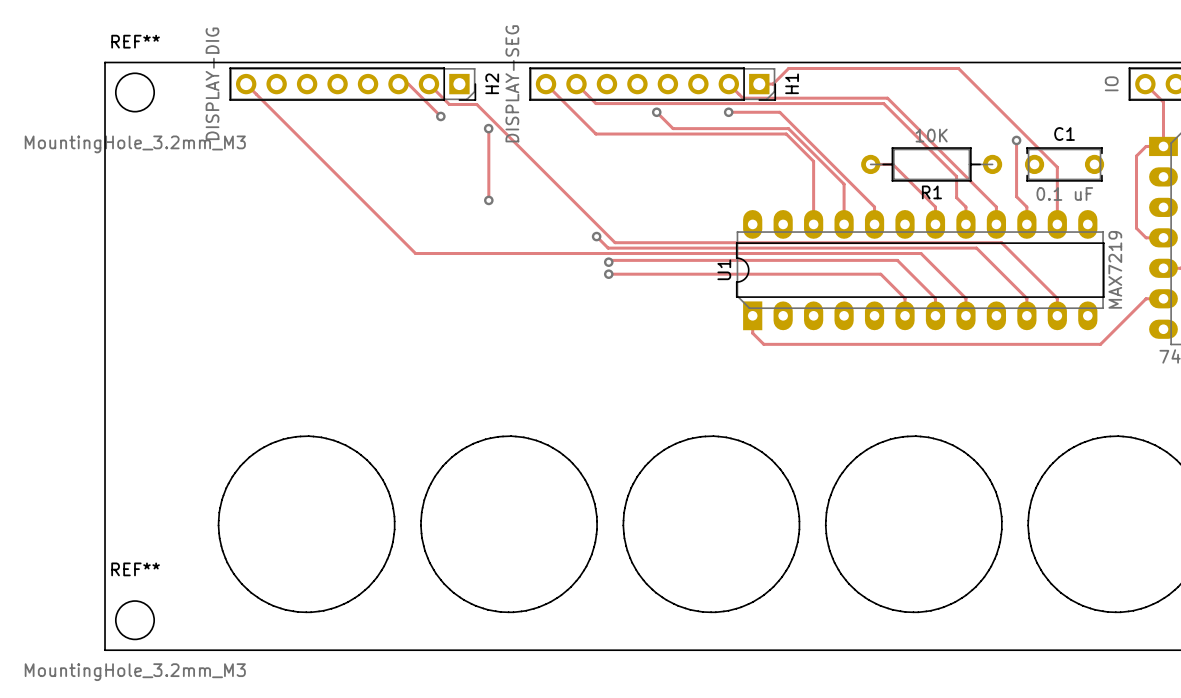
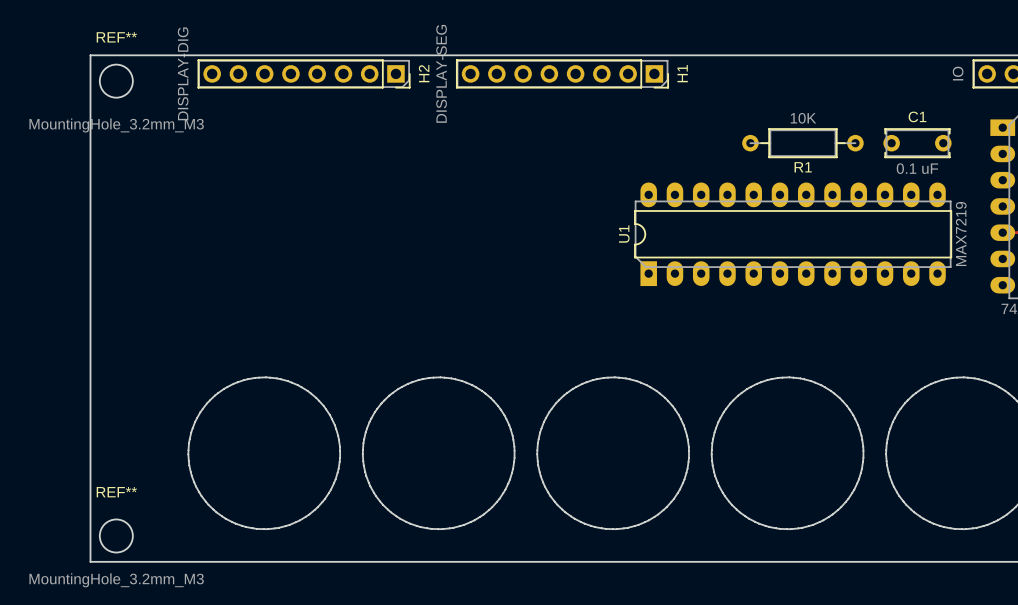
track: (246, 84) (415, 253) (921, 253) (965, 298) (965, 315) -> none
track: (398, 84) (408, 84) (440, 116) -> none
track: (428, 84) (449, 104) (476, 104) (615, 242) (1001, 242) (1057, 298) (1057, 315) -> none
track: (546, 84) (595, 134) (786, 134) (813, 161) (813, 224) -> none
track: (576, 84) (595, 103) (883, 103) (956, 176) (956, 197) (965, 207) (965, 224) -> none
track: (728, 84) (742, 98) (887, 98) (996, 207) (996, 224) -> none
track: (759, 84) (773, 84) (788, 68) (958, 68) (1057, 167) (1057, 224) -> none
track: (1145, 84) (1163, 102) (1163, 146) (1146, 146) (1136, 156) (1136, 228) (1146, 237) (1163, 237) -> none
track: (656, 112) (673, 128) (788, 128) (844, 184) (844, 224) -> none
via: (656, 112) -> none
track: (728, 112) (779, 112) (874, 207) (874, 224) -> none
via: (728, 112) -> none
via: (440, 116) -> none
track: (488, 128) (488, 200) -> none
via: (488, 128) -> none
track: (1016, 140) (1016, 196) (1026, 207) (1026, 224) -> none
via: (1016, 140) -> none
track: (870, 164) (892, 164) (935, 207) (935, 224) -> none
via: (488, 200) -> none
track: (596, 236) (608, 248) (976, 248) (1026, 298) (1026, 315) -> none
via: (596, 236) -> none
track: (608, 262) (610, 260) (897, 260) (935, 298) (935, 315) -> none
via: (608, 262) -> none
track: (608, 274) (880, 274) (905, 298) (905, 315) -> none
via: (608, 274) -> none
track: (1163, 298) (1146, 298) (1100, 344) (763, 344) (752, 333) (752, 315) -> none

